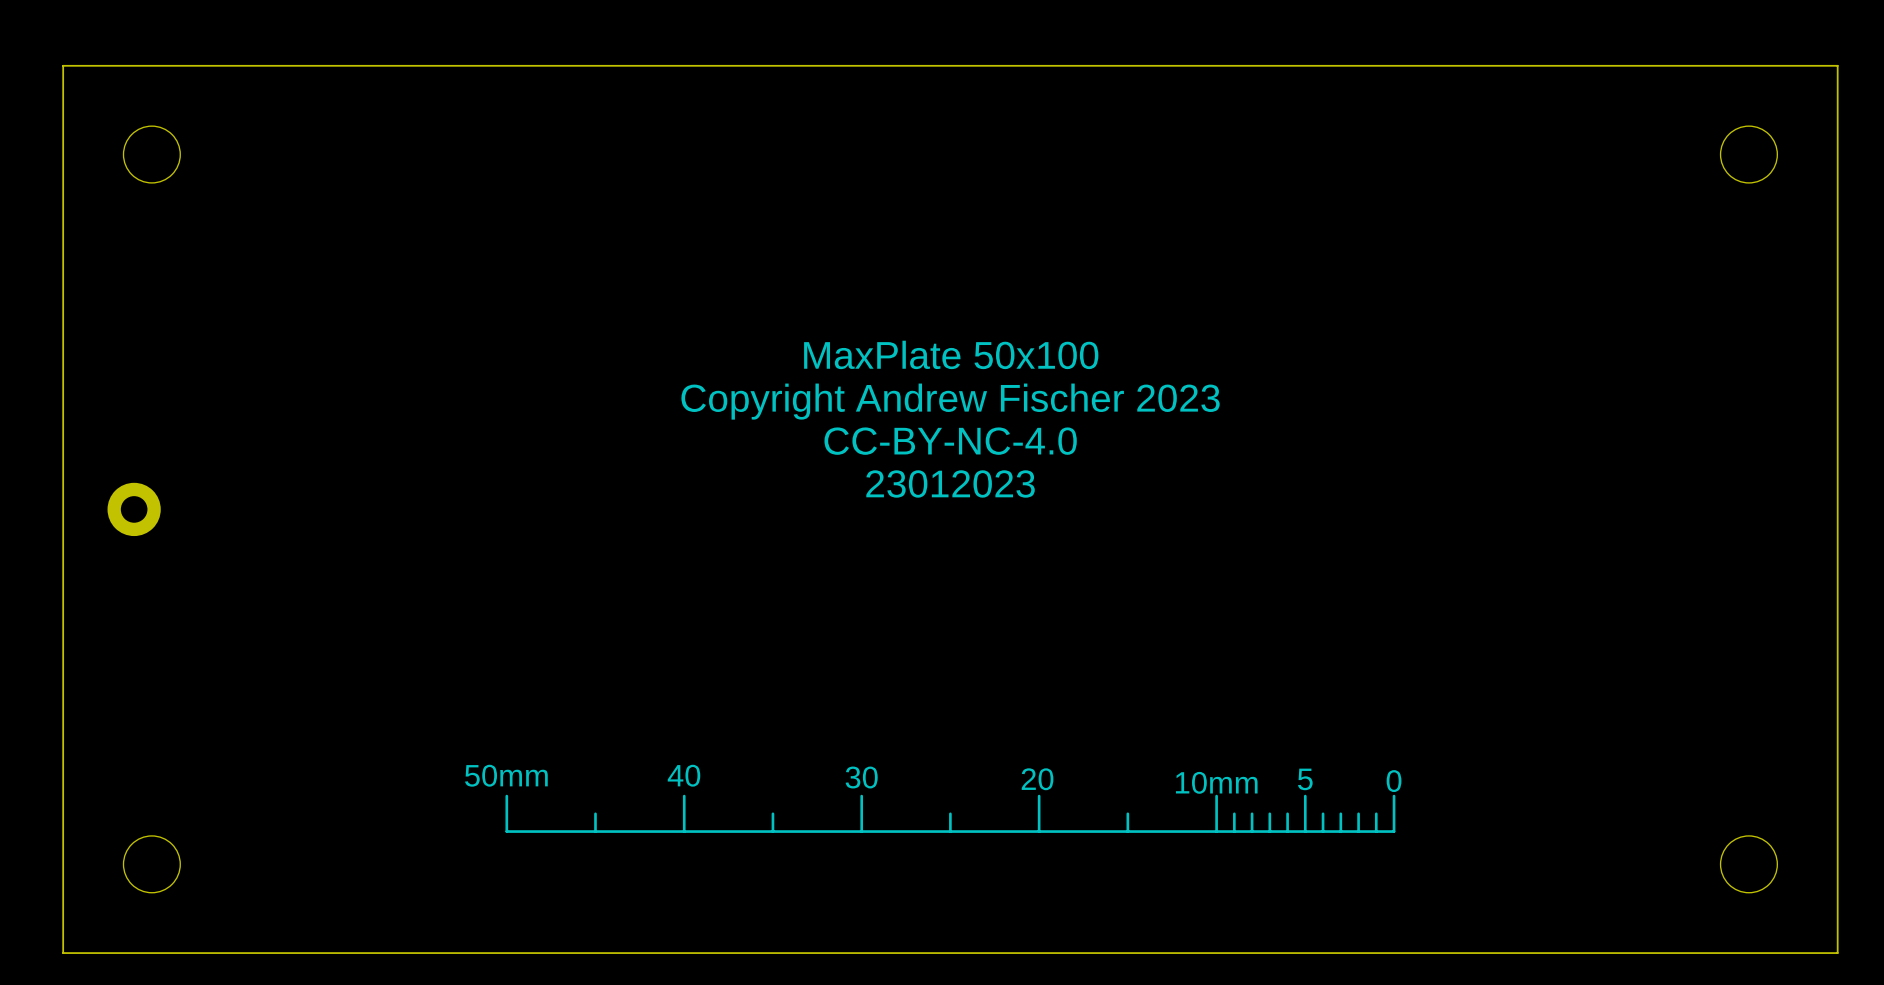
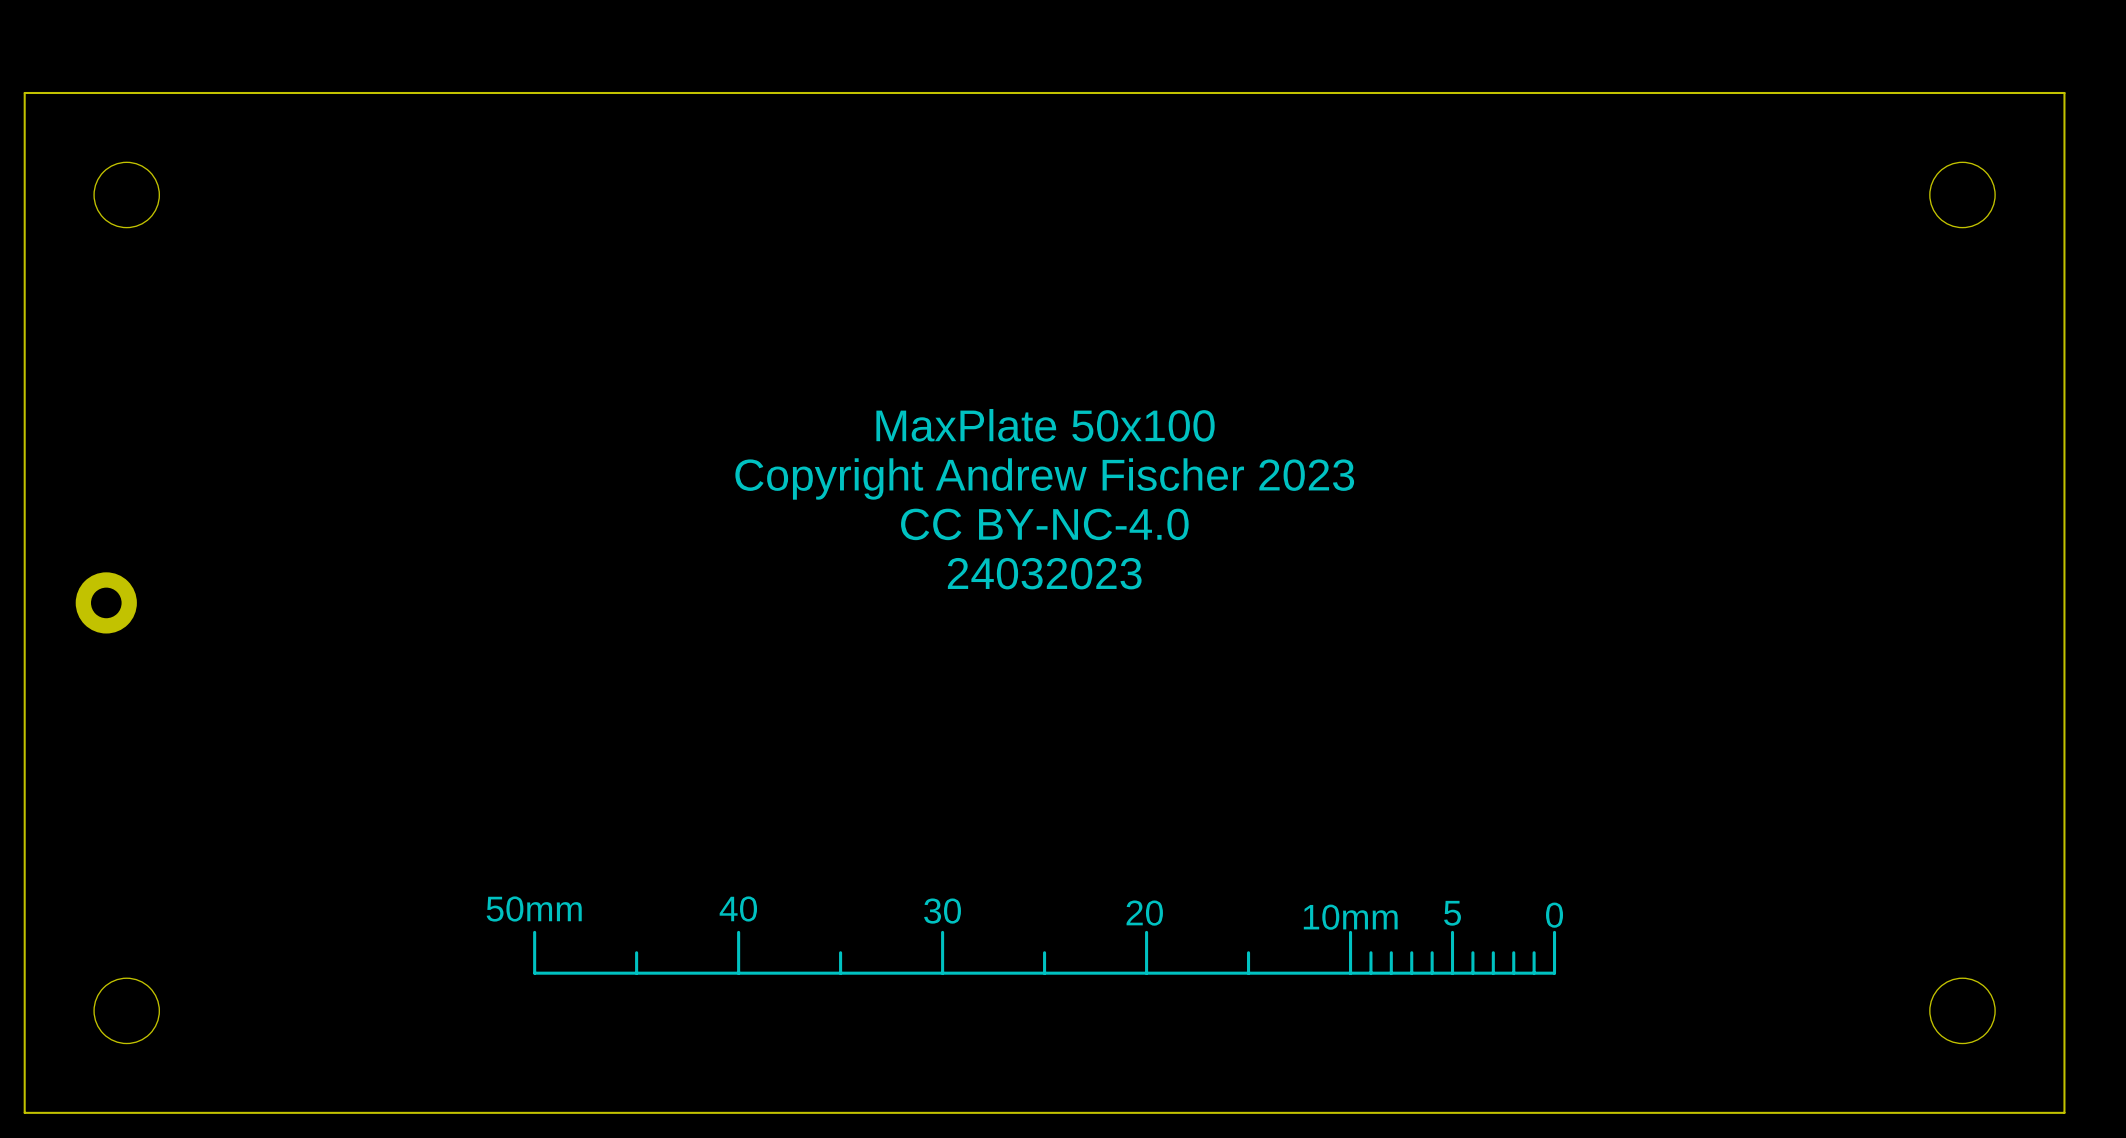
text: CC-BY-NC-4.0 (950, 441) -> CC BY-NC-4.0 (1044, 524)
text: 23012023 (950, 483) -> 24032023 (1044, 573)

